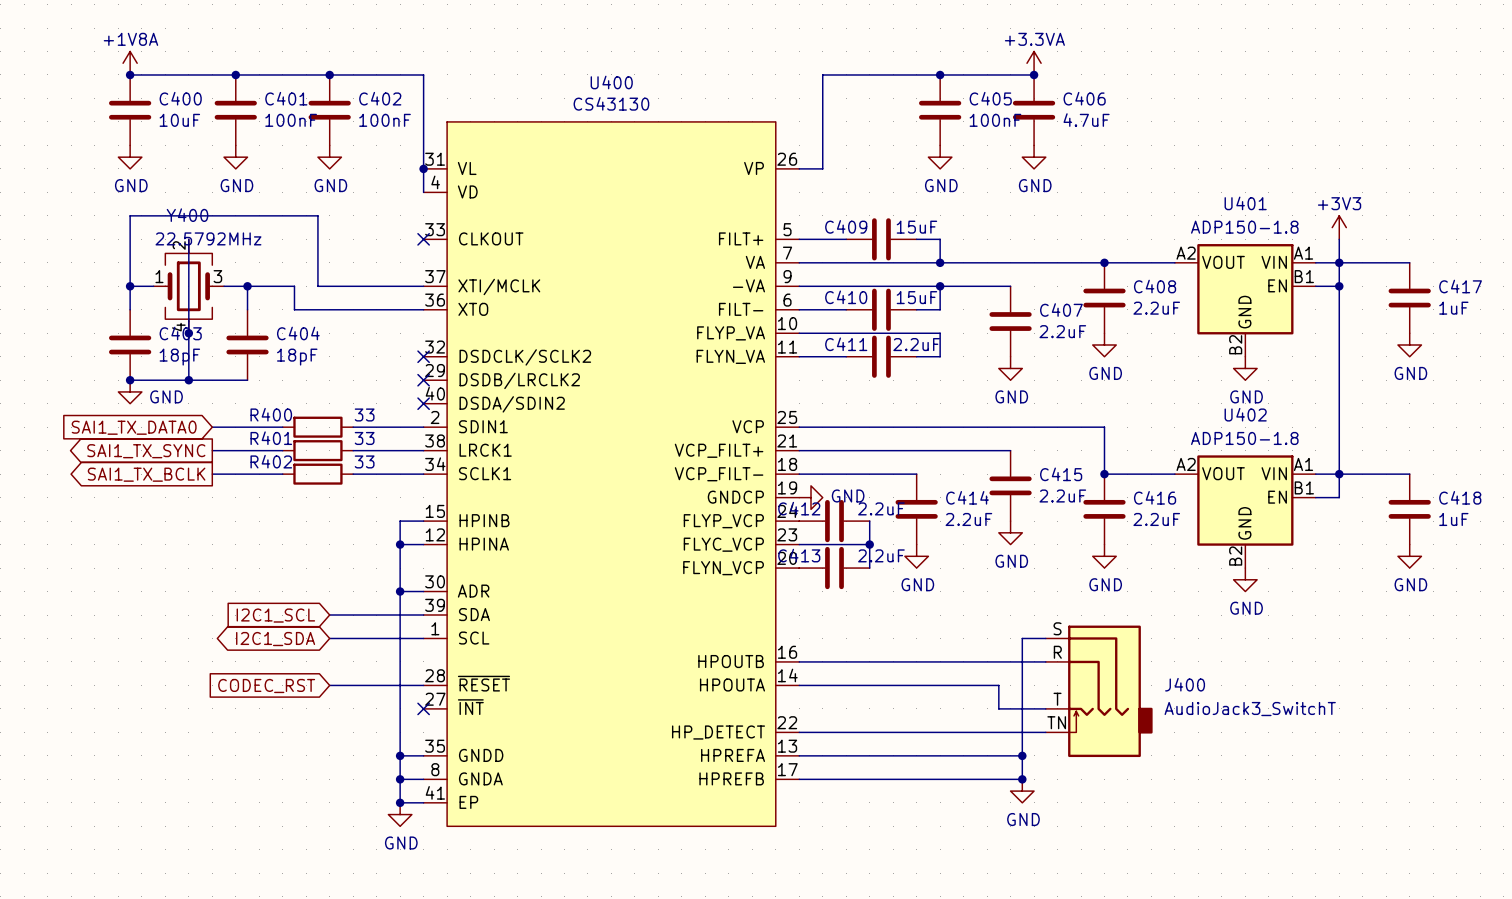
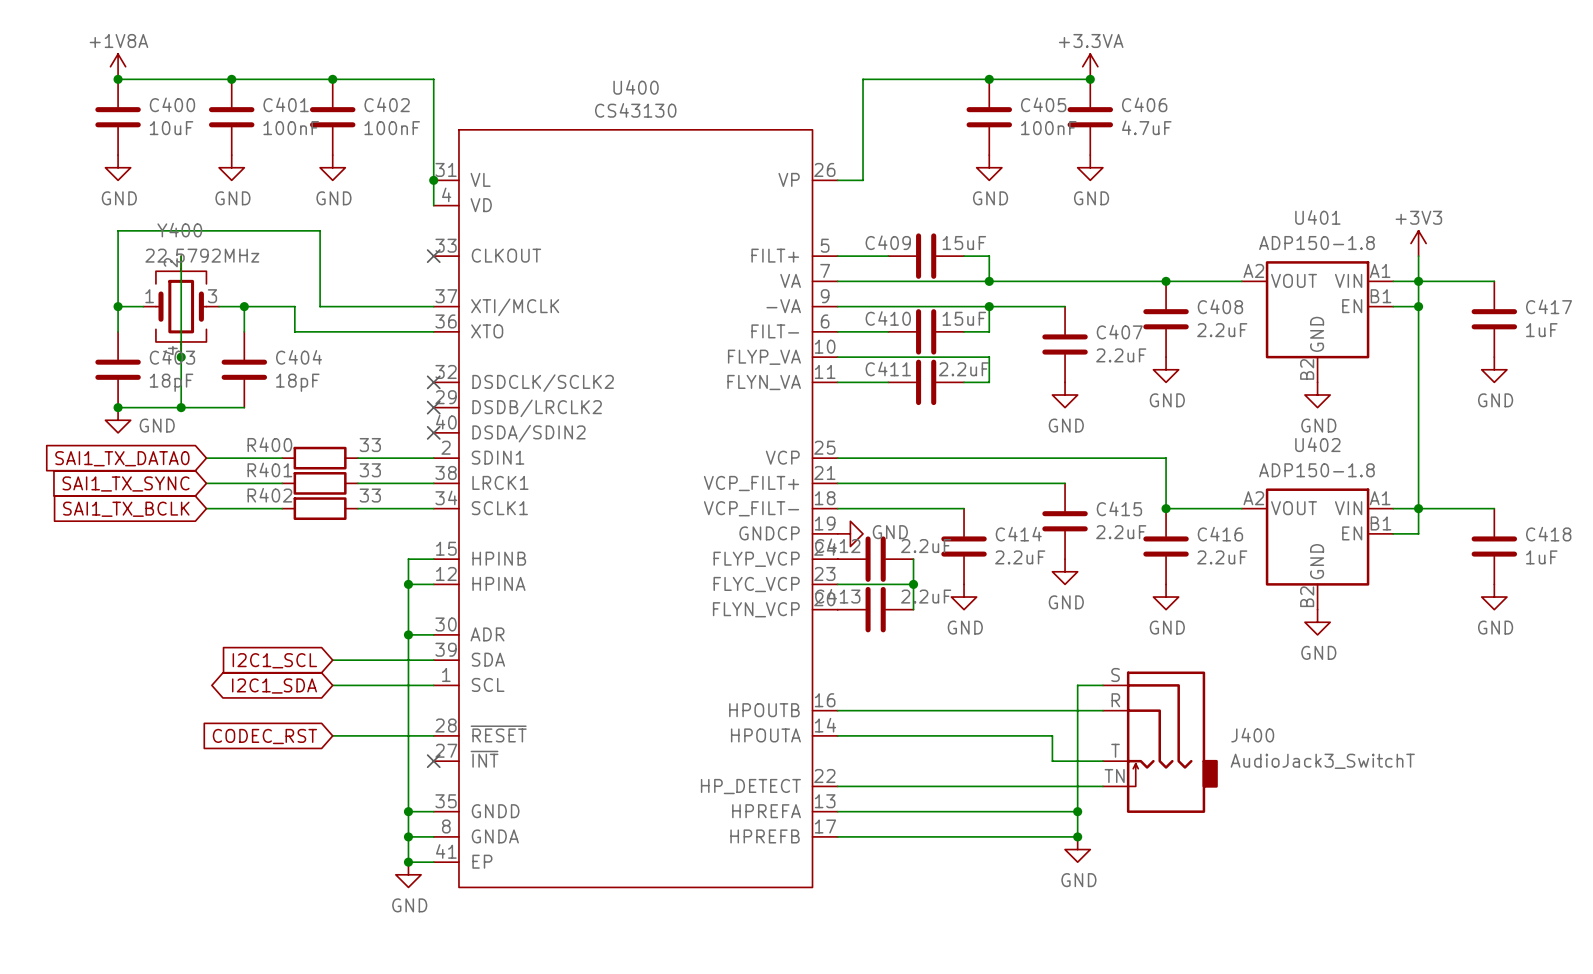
global label shape: output (146, 451) -> input (126, 483)
global label shape: output (146, 474) -> input (126, 509)

